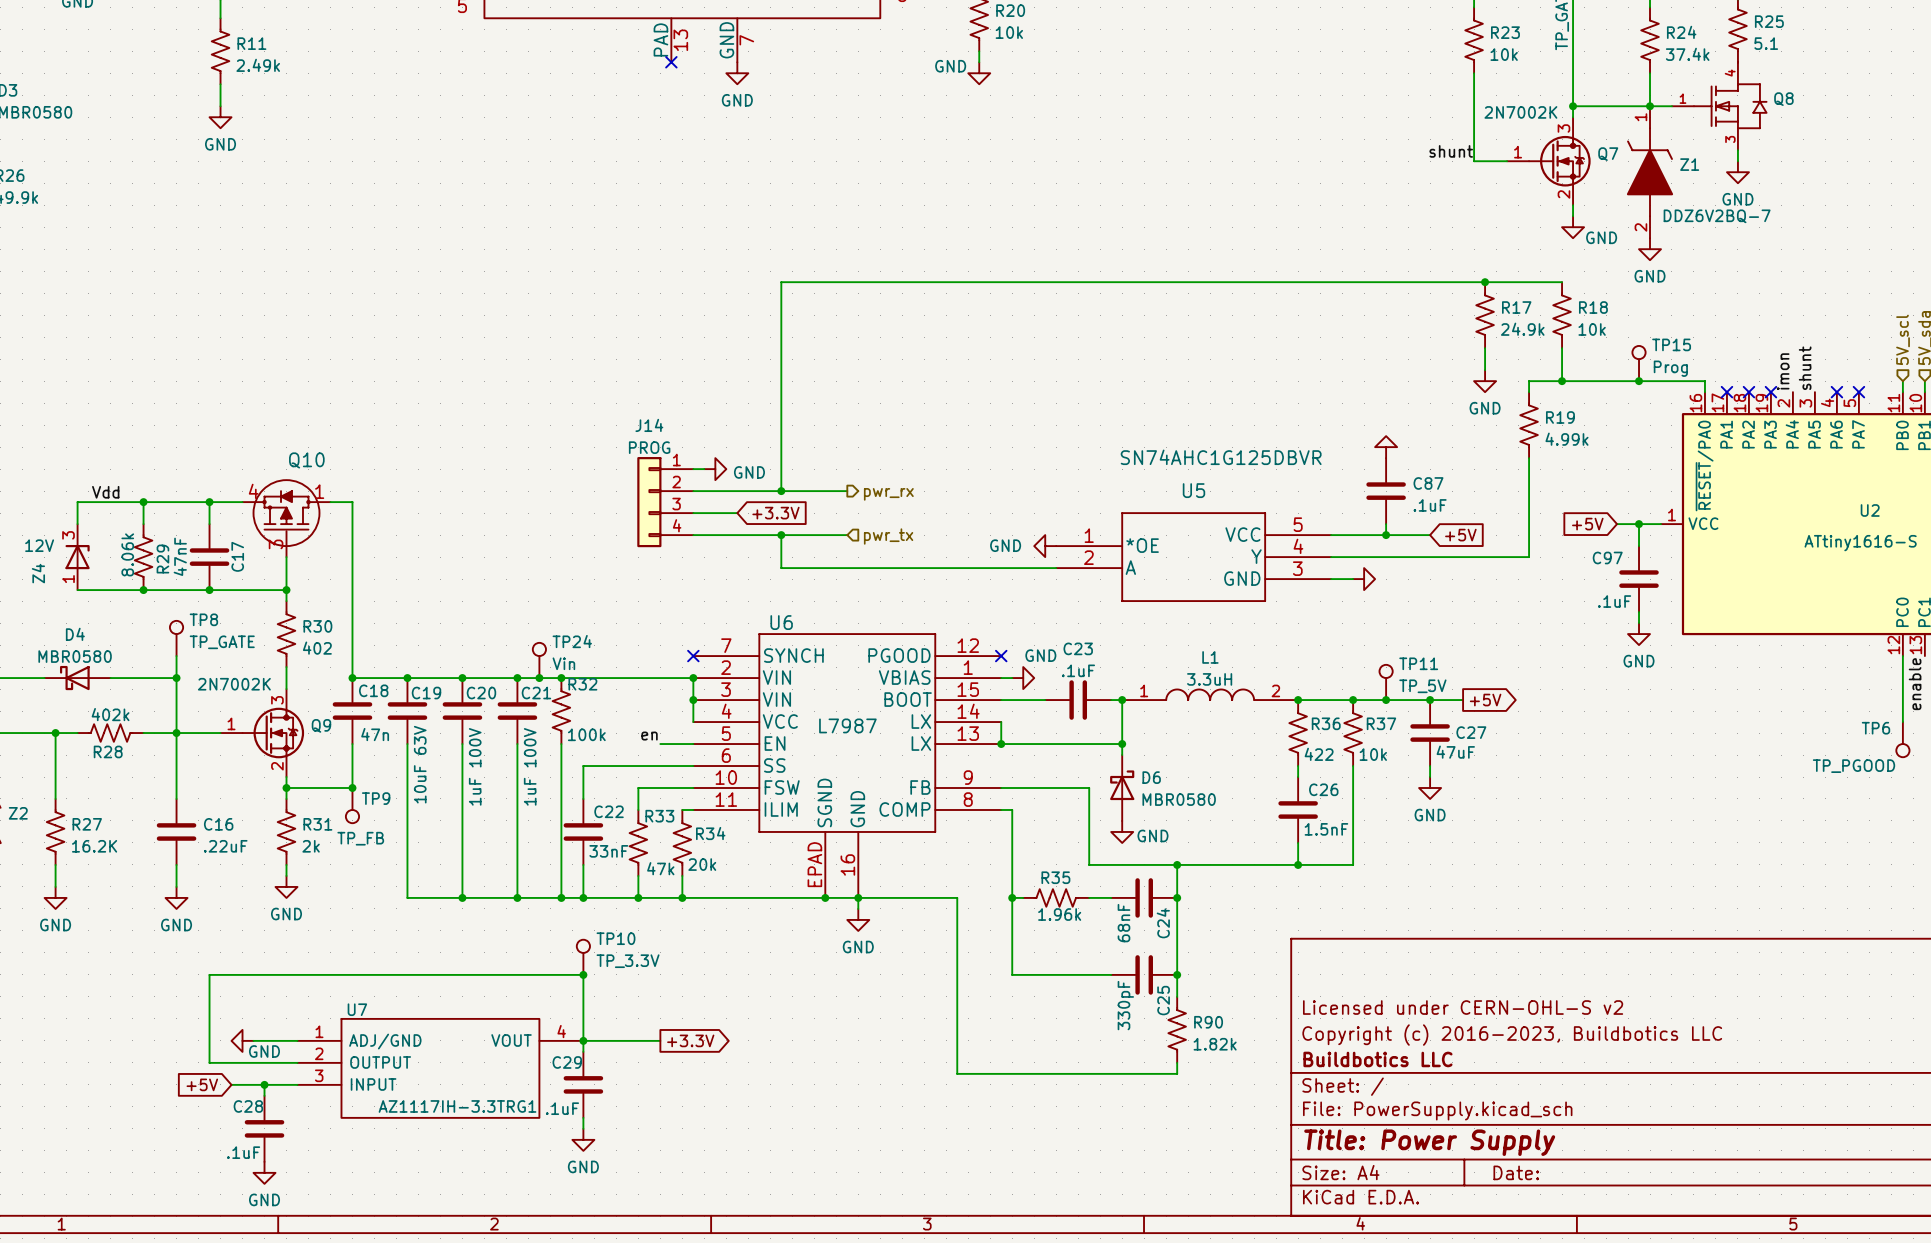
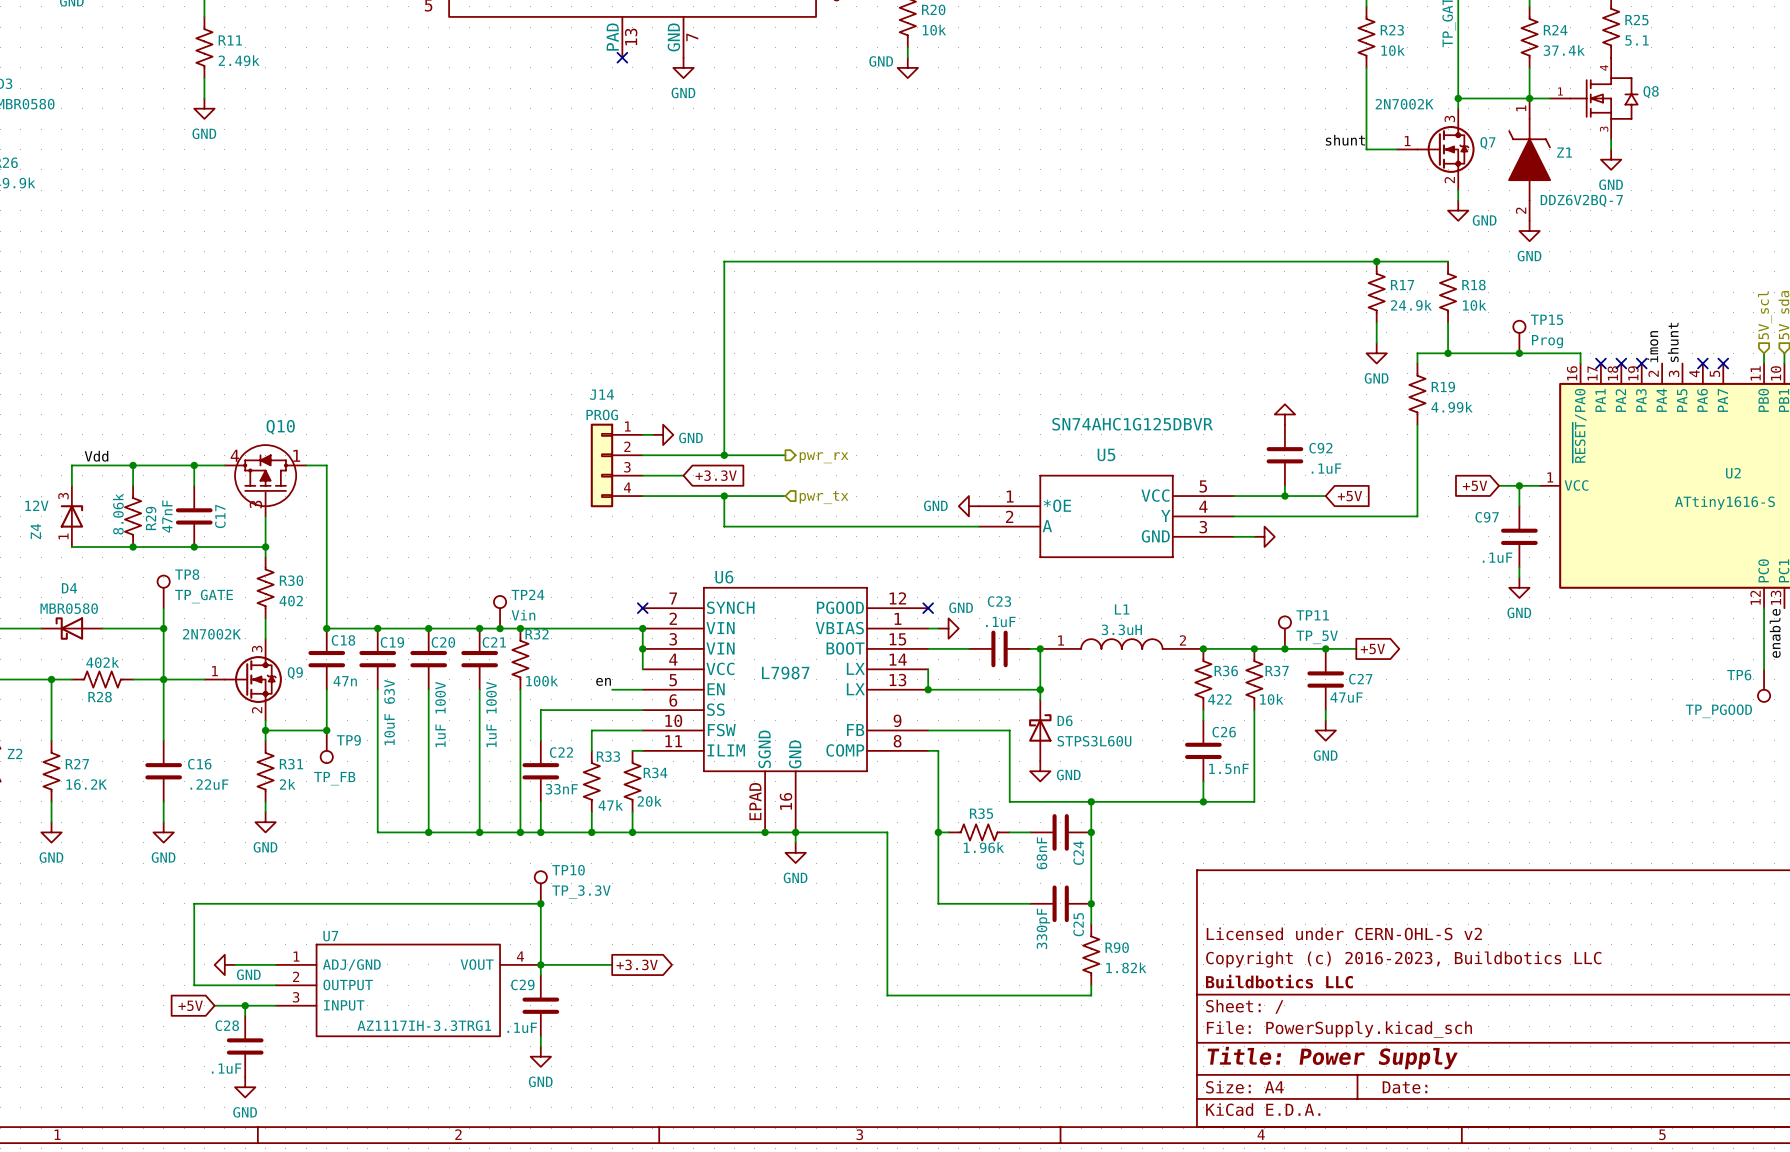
C87 name: C87 (1428, 483) -> C92 (1320, 448)
D6 value: MBR0580 (1179, 799) -> STPS3L60U (1094, 741)

